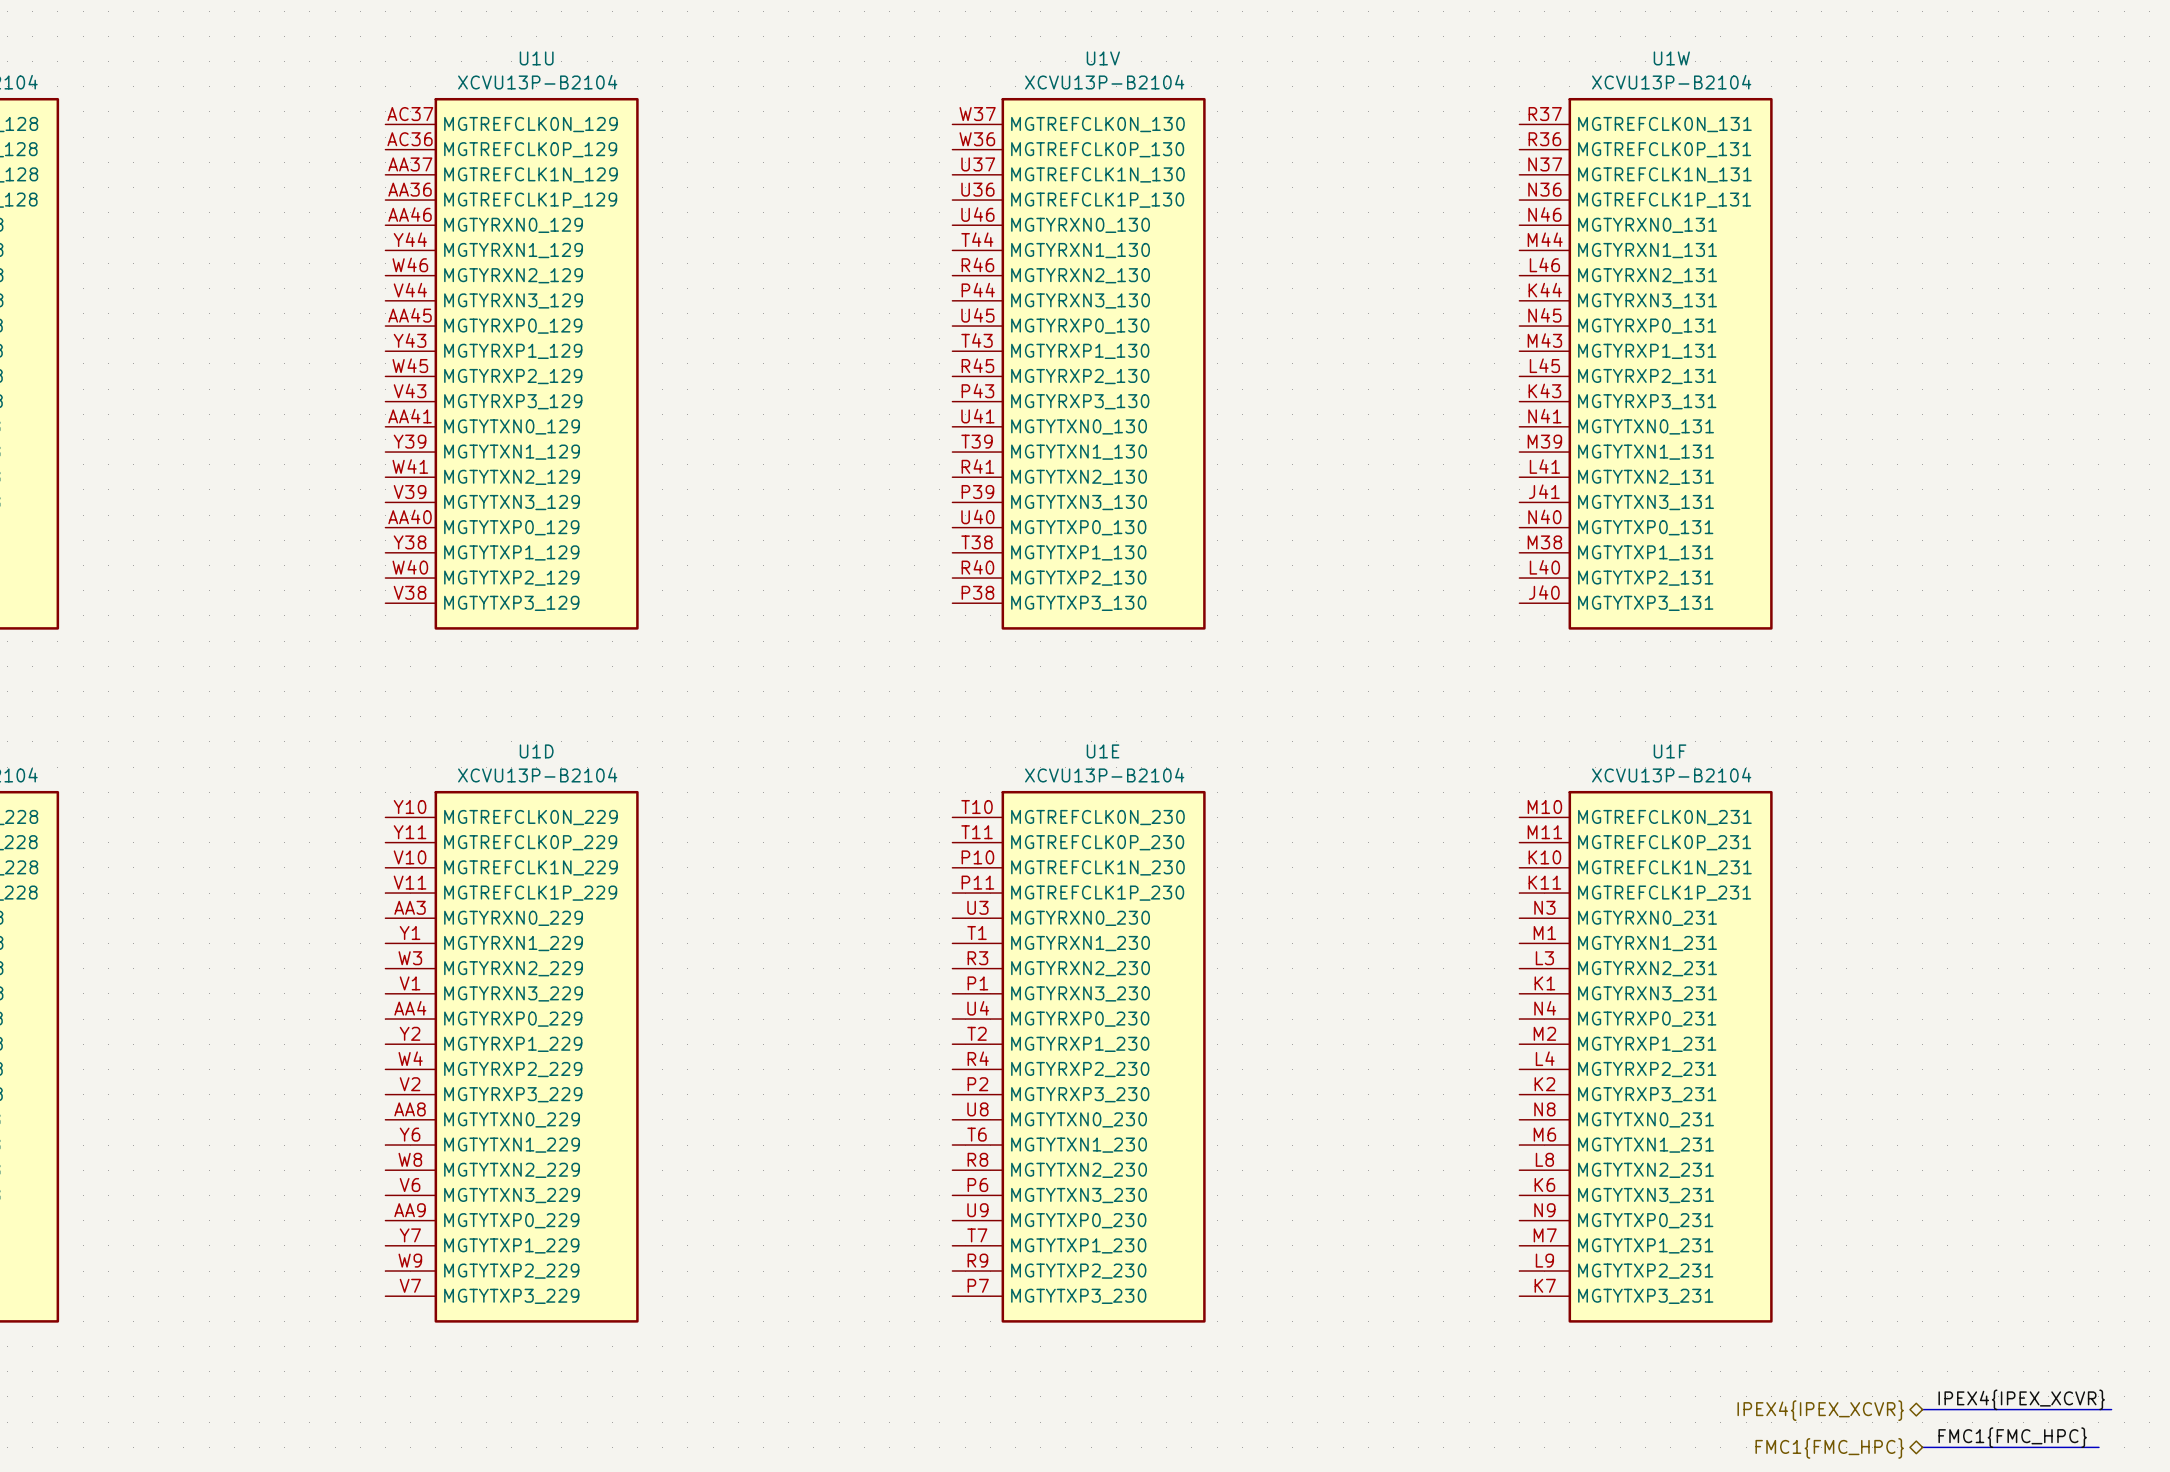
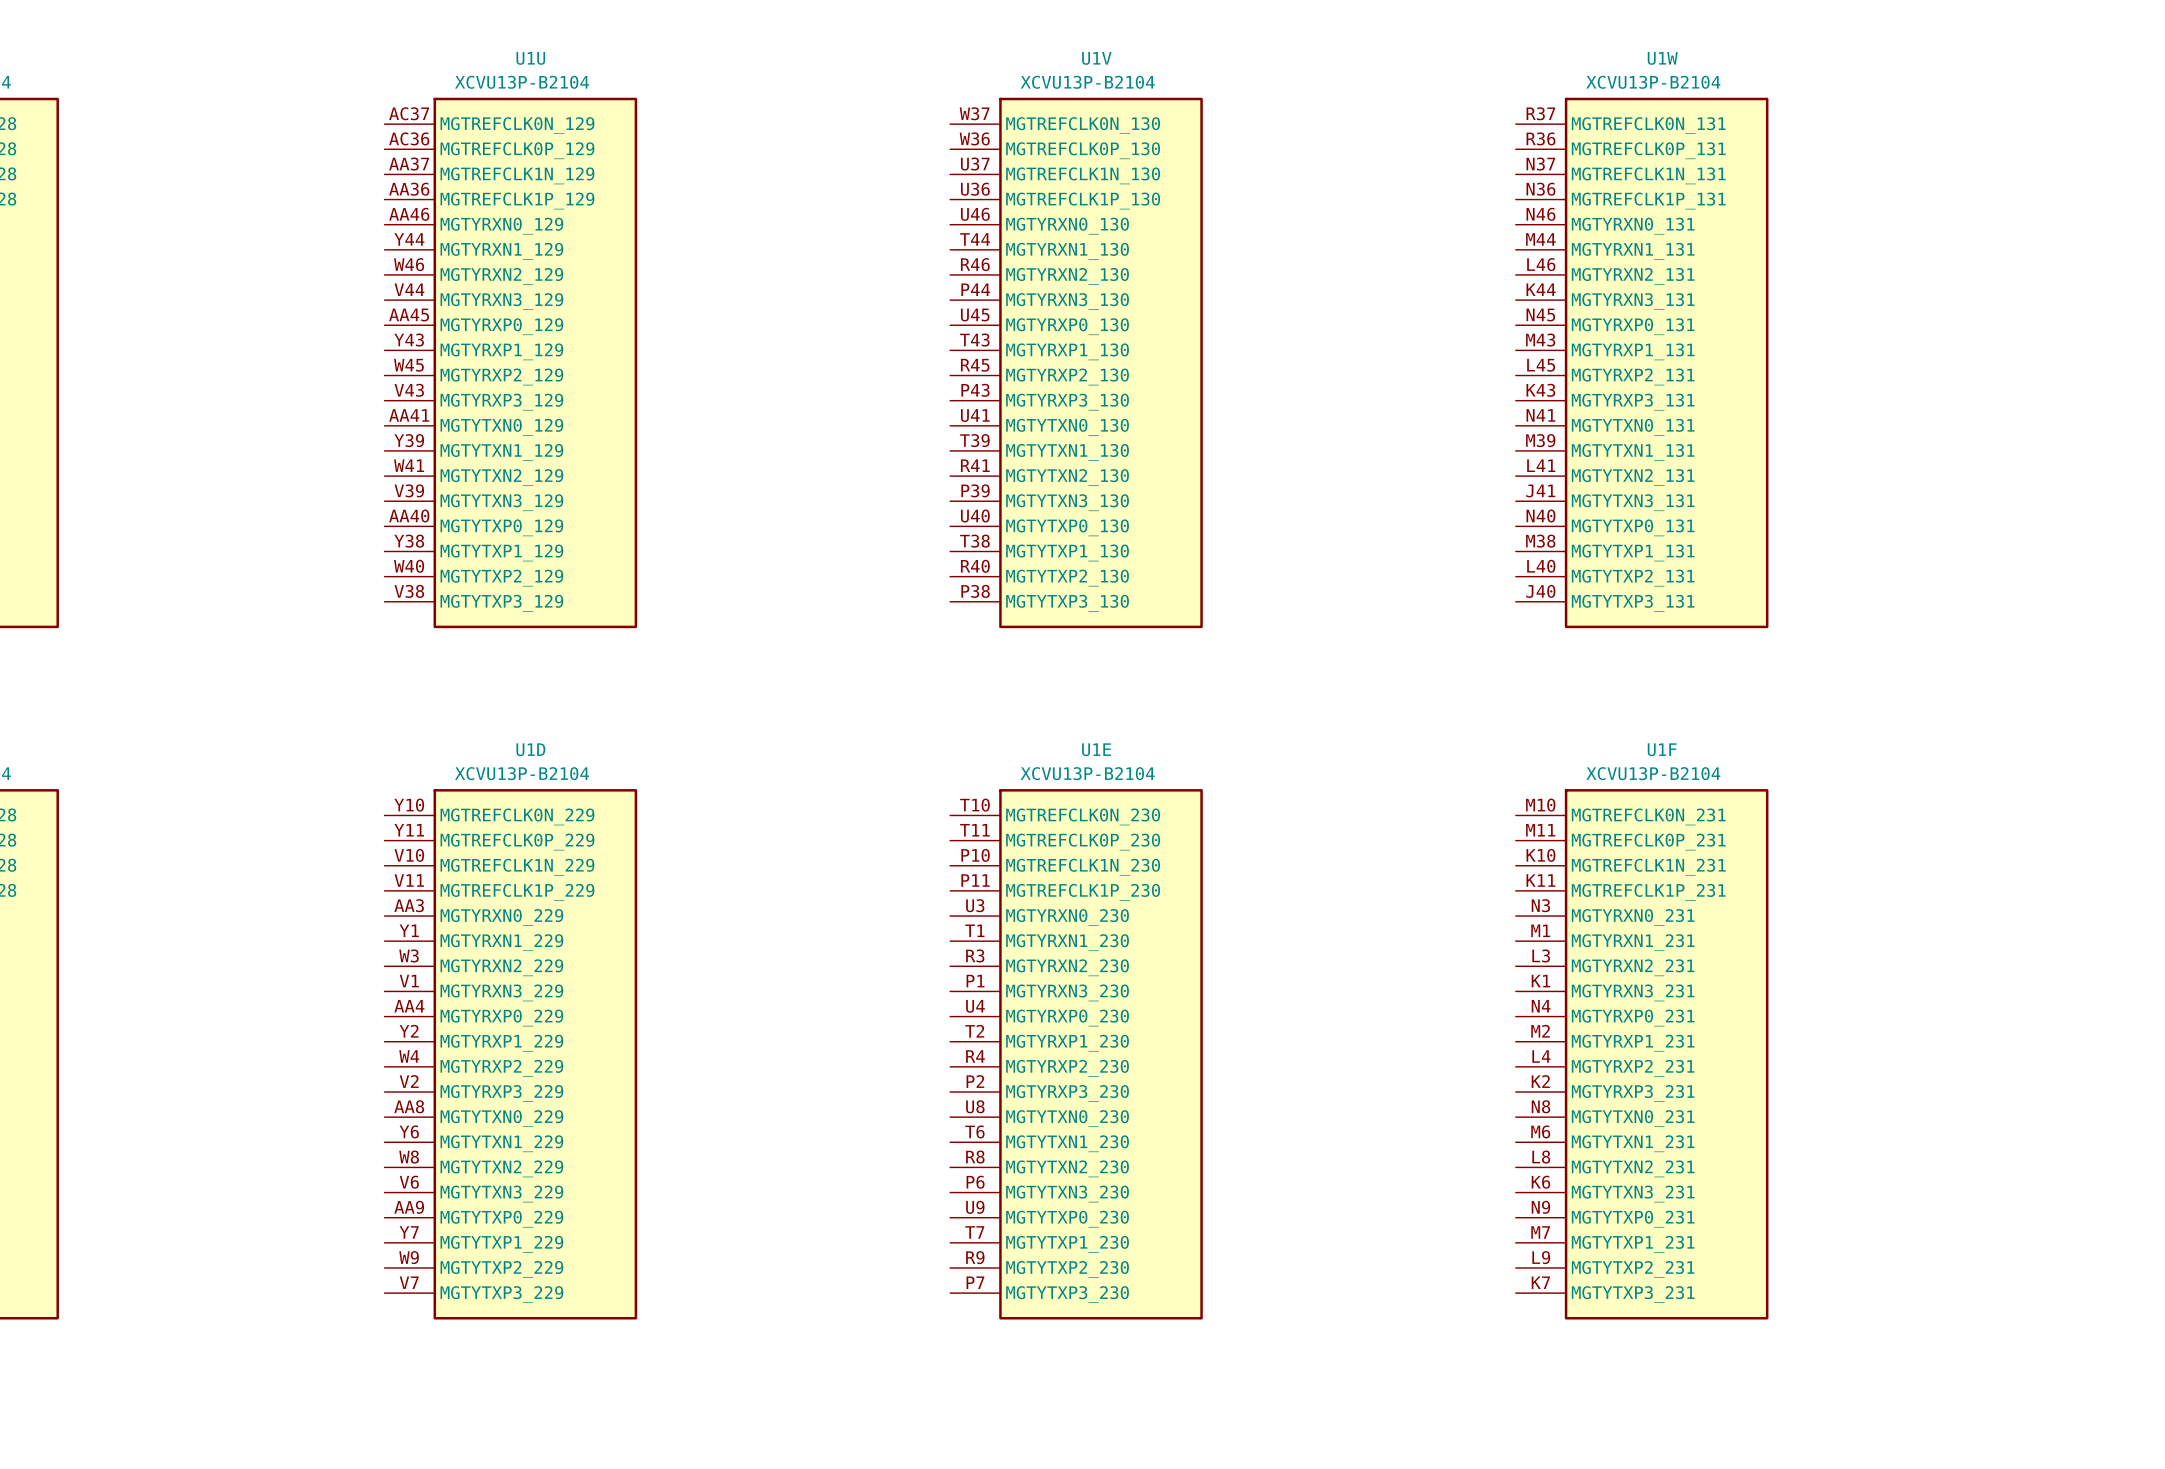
label: IPEX4{IPEX_XCVR} (2021, 1399) -> none
bus: (1922, 1409) (2111, 1409) -> none
hierarchical label: IPEX4{IPEX_XCVR} (1820, 1410) -> none
label: FMC1{FMC_HPC} (2012, 1437) -> none
bus: (1922, 1447) (2098, 1447) -> none
hierarchical label: FMC1{FMC_HPC} (1829, 1448) -> none

